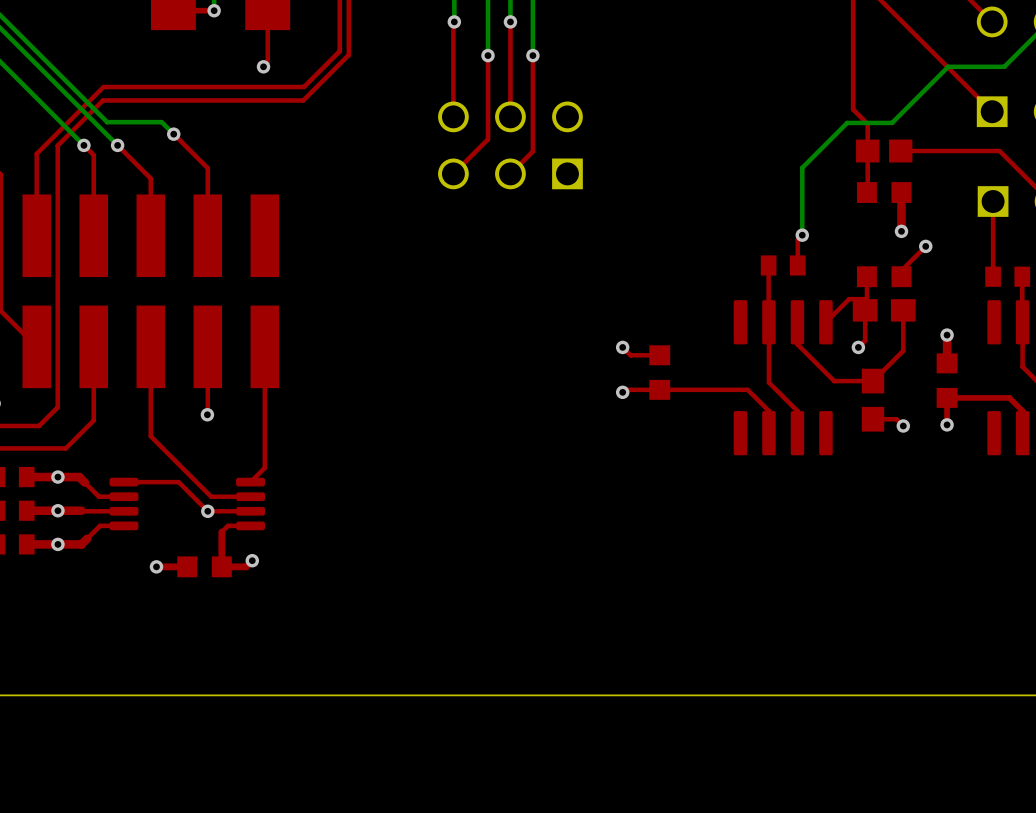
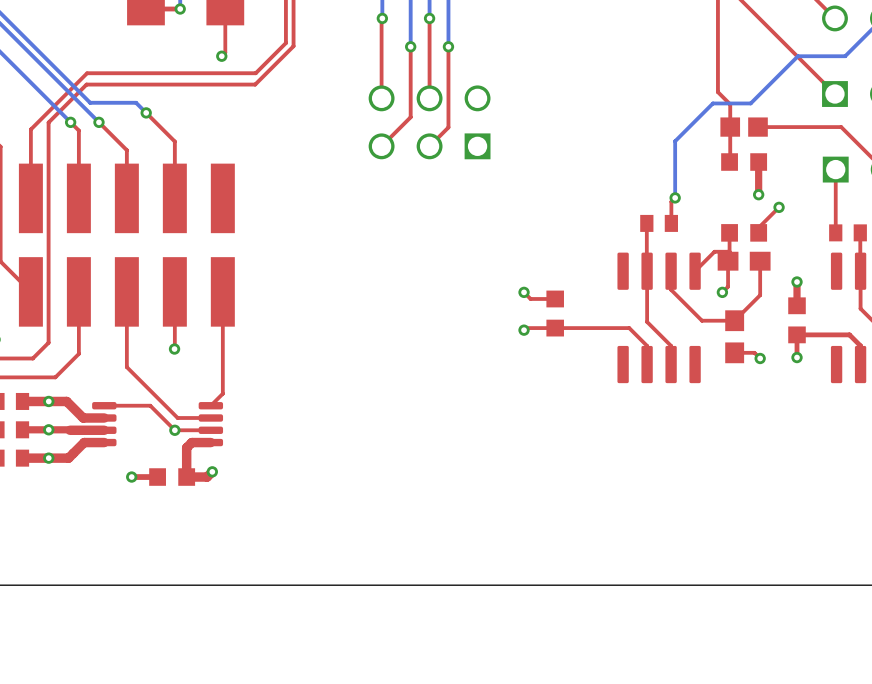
top track width: thin (26, 477) (79, 477) (98, 496) (123, 496) -> thick (22, 401) (66, 401) (83, 418) (104, 418)
top track width: thin (123, 511) (83, 511) -> thick (104, 430) (70, 430)
top track width: thin (123, 525) (100, 525) (81, 544) (26, 544) -> thick (104, 442) (84, 442) (68, 458) (22, 458)
top track width: thin (250, 525) (228, 525) (221, 532) (221, 566) (246, 566) (252, 560) -> thick (210, 442) (191, 442) (186, 447) (186, 477) (207, 477) (212, 471)

